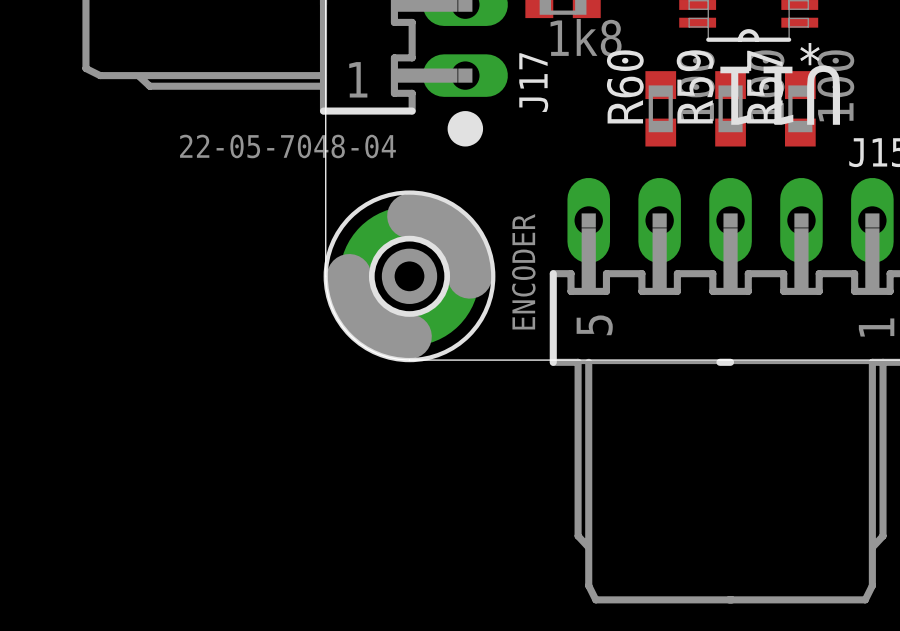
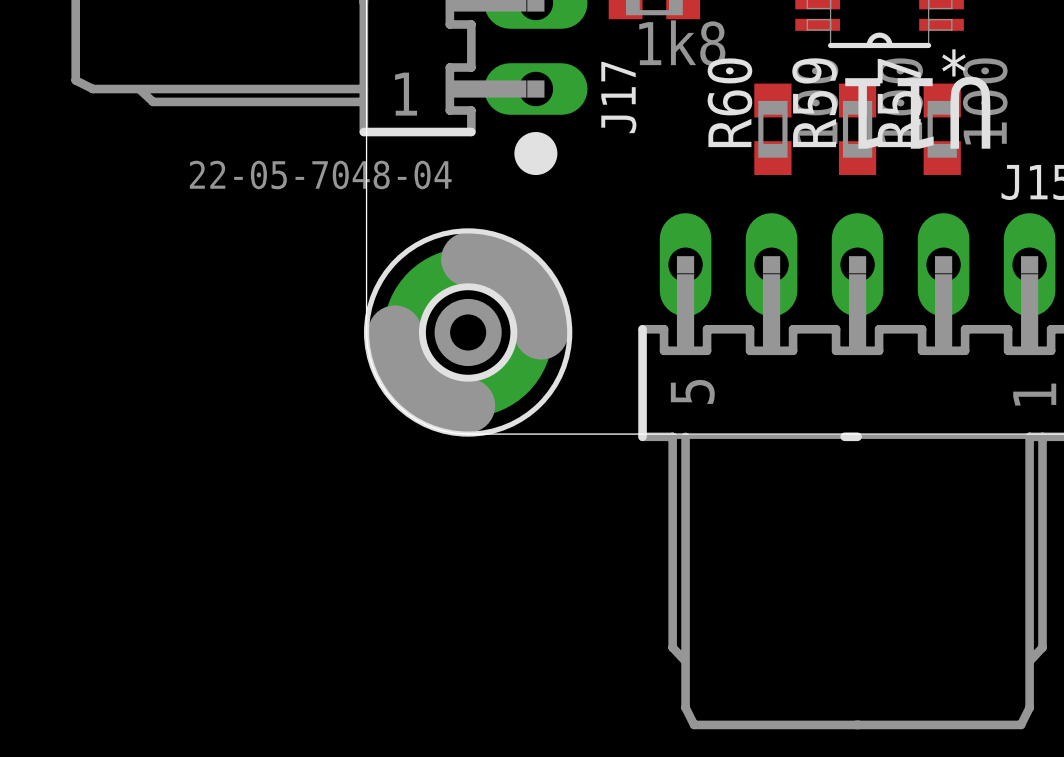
text: ENCODER (523, 271) -> none

